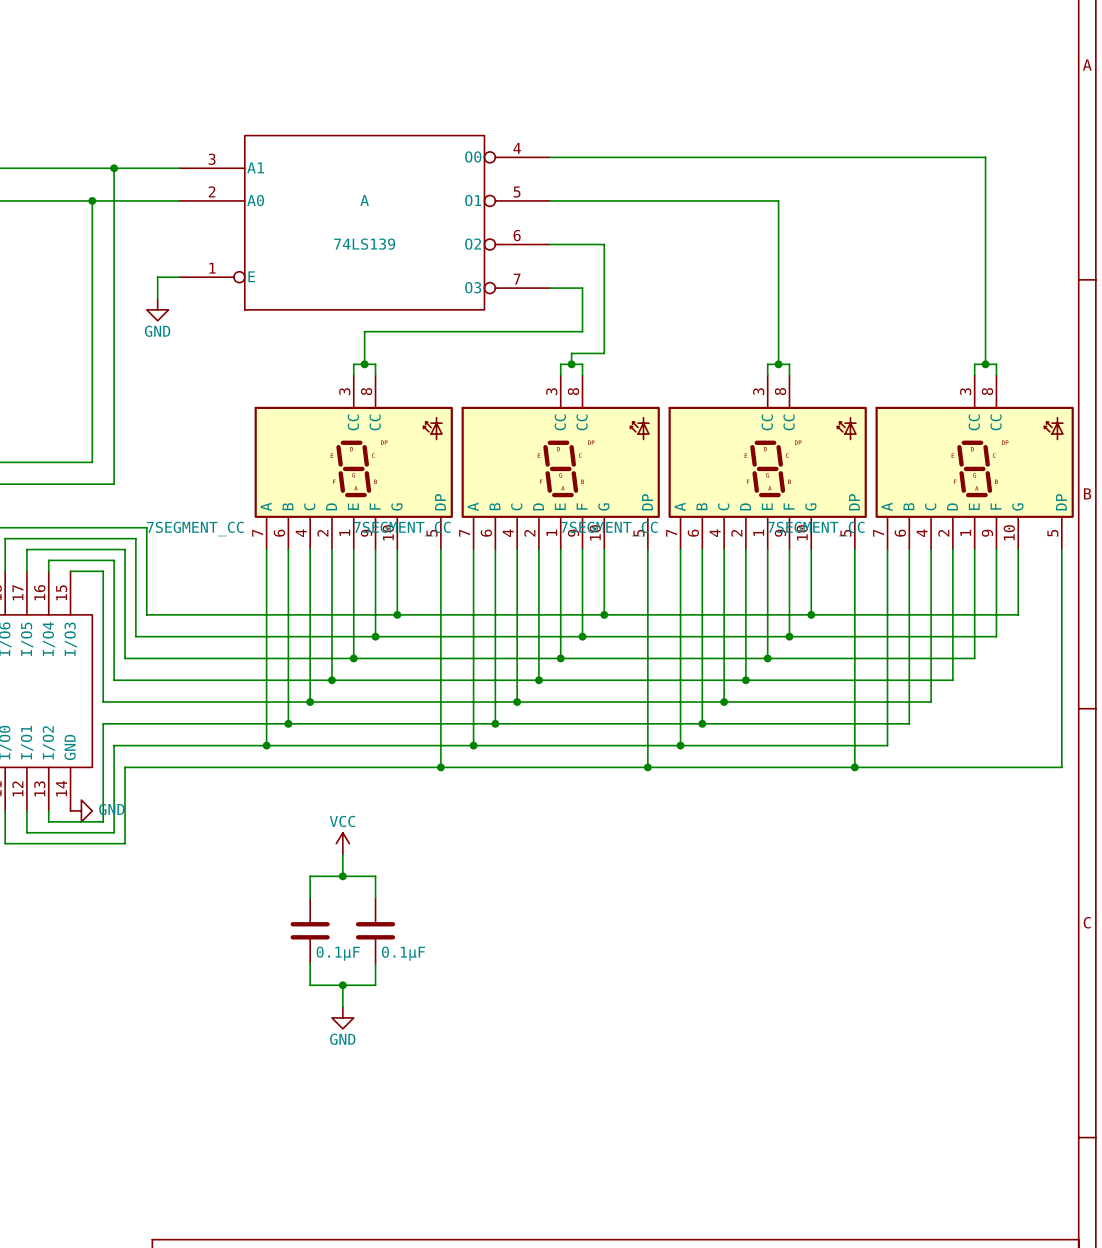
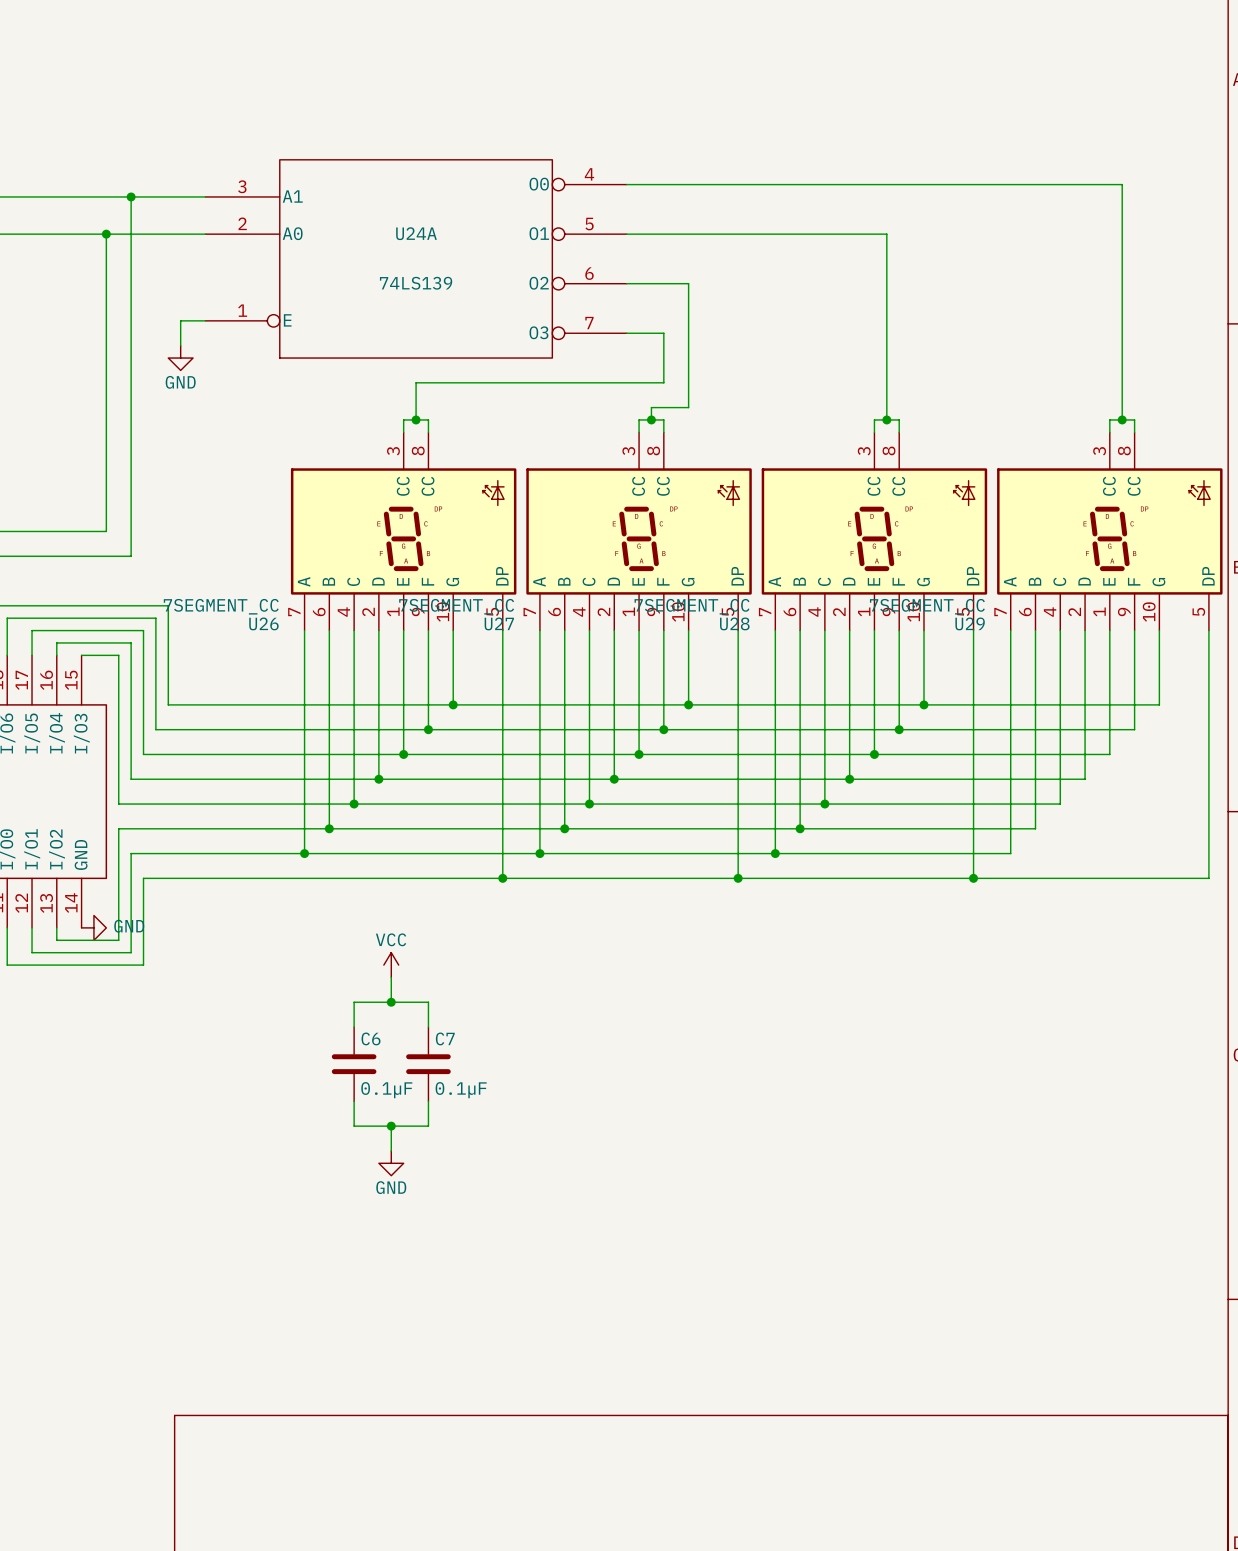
A name: A (364, 200) -> U24A (416, 233)
U26 name: none -> U26 (263, 623)
U27 name: none -> U27 (499, 623)
U28 name: none -> U28 (734, 623)
U29 name: none -> U29 (970, 623)
C6 name: none -> C6 (371, 1038)
C7 name: none -> C7 (445, 1038)

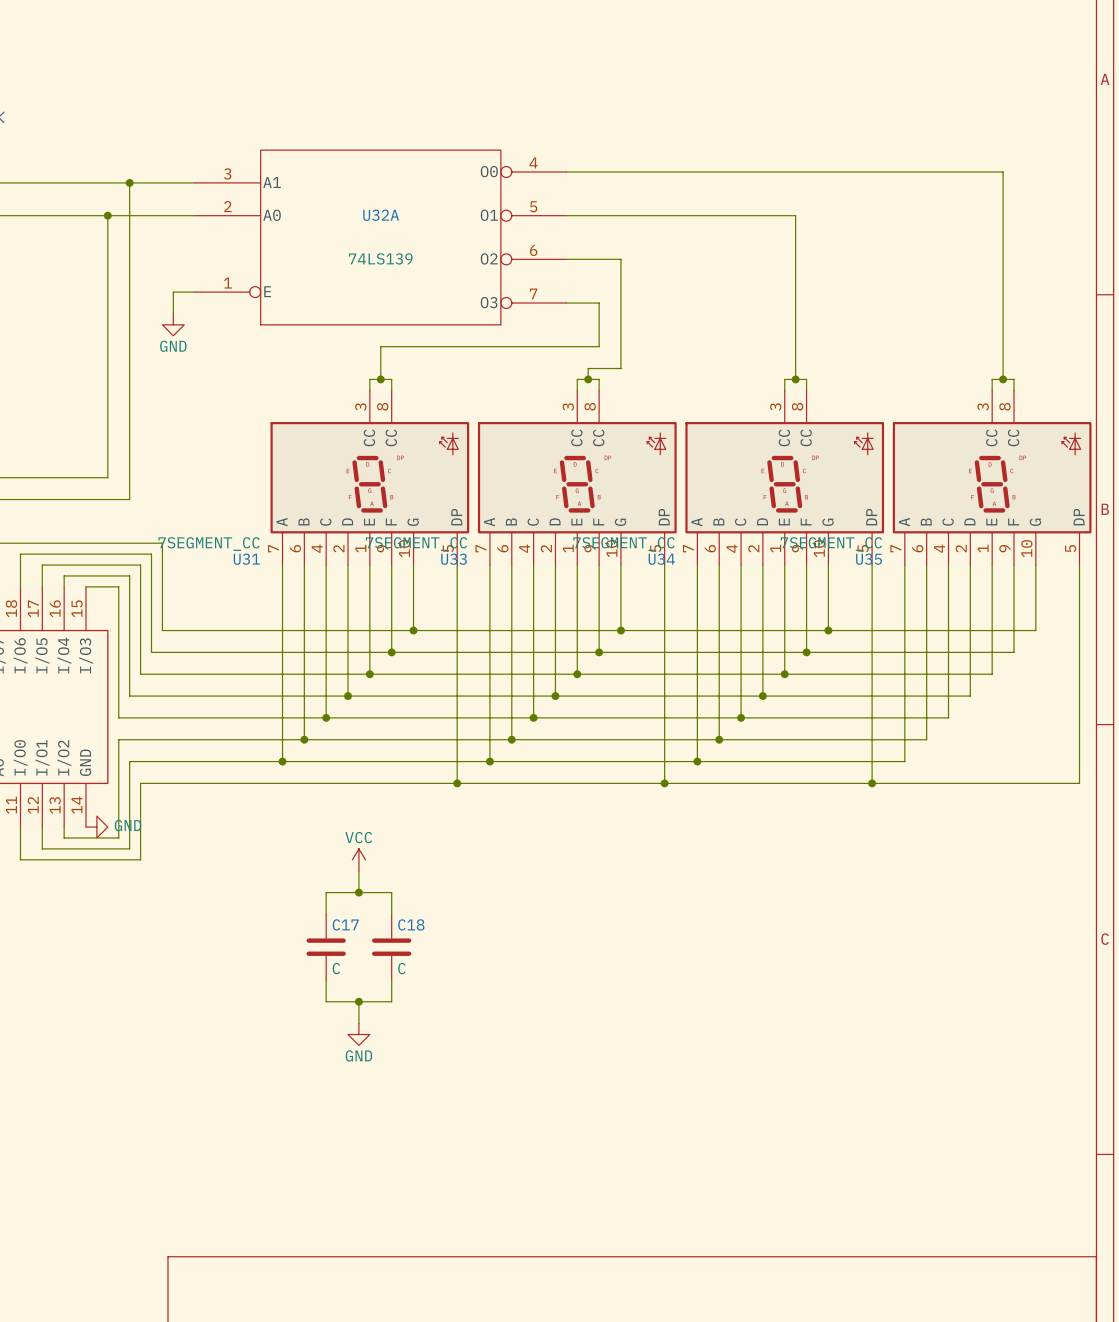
U24A name: U24A (416, 233) -> U32A (381, 215)
U26 name: U26 (263, 623) -> U31 (246, 559)
U27 name: U27 (499, 623) -> U33 (454, 559)
U28 name: U28 (734, 623) -> U34 (661, 559)
U29 name: U29 (970, 623) -> U35 (869, 559)
C6 name: C6 (371, 1038) -> C17 (345, 924)
C7 name: C7 (445, 1038) -> C18 (411, 924)
C6 value: 0.1µF (386, 1090) -> C (336, 968)
C7 value: 0.1µF (461, 1090) -> C (401, 968)

